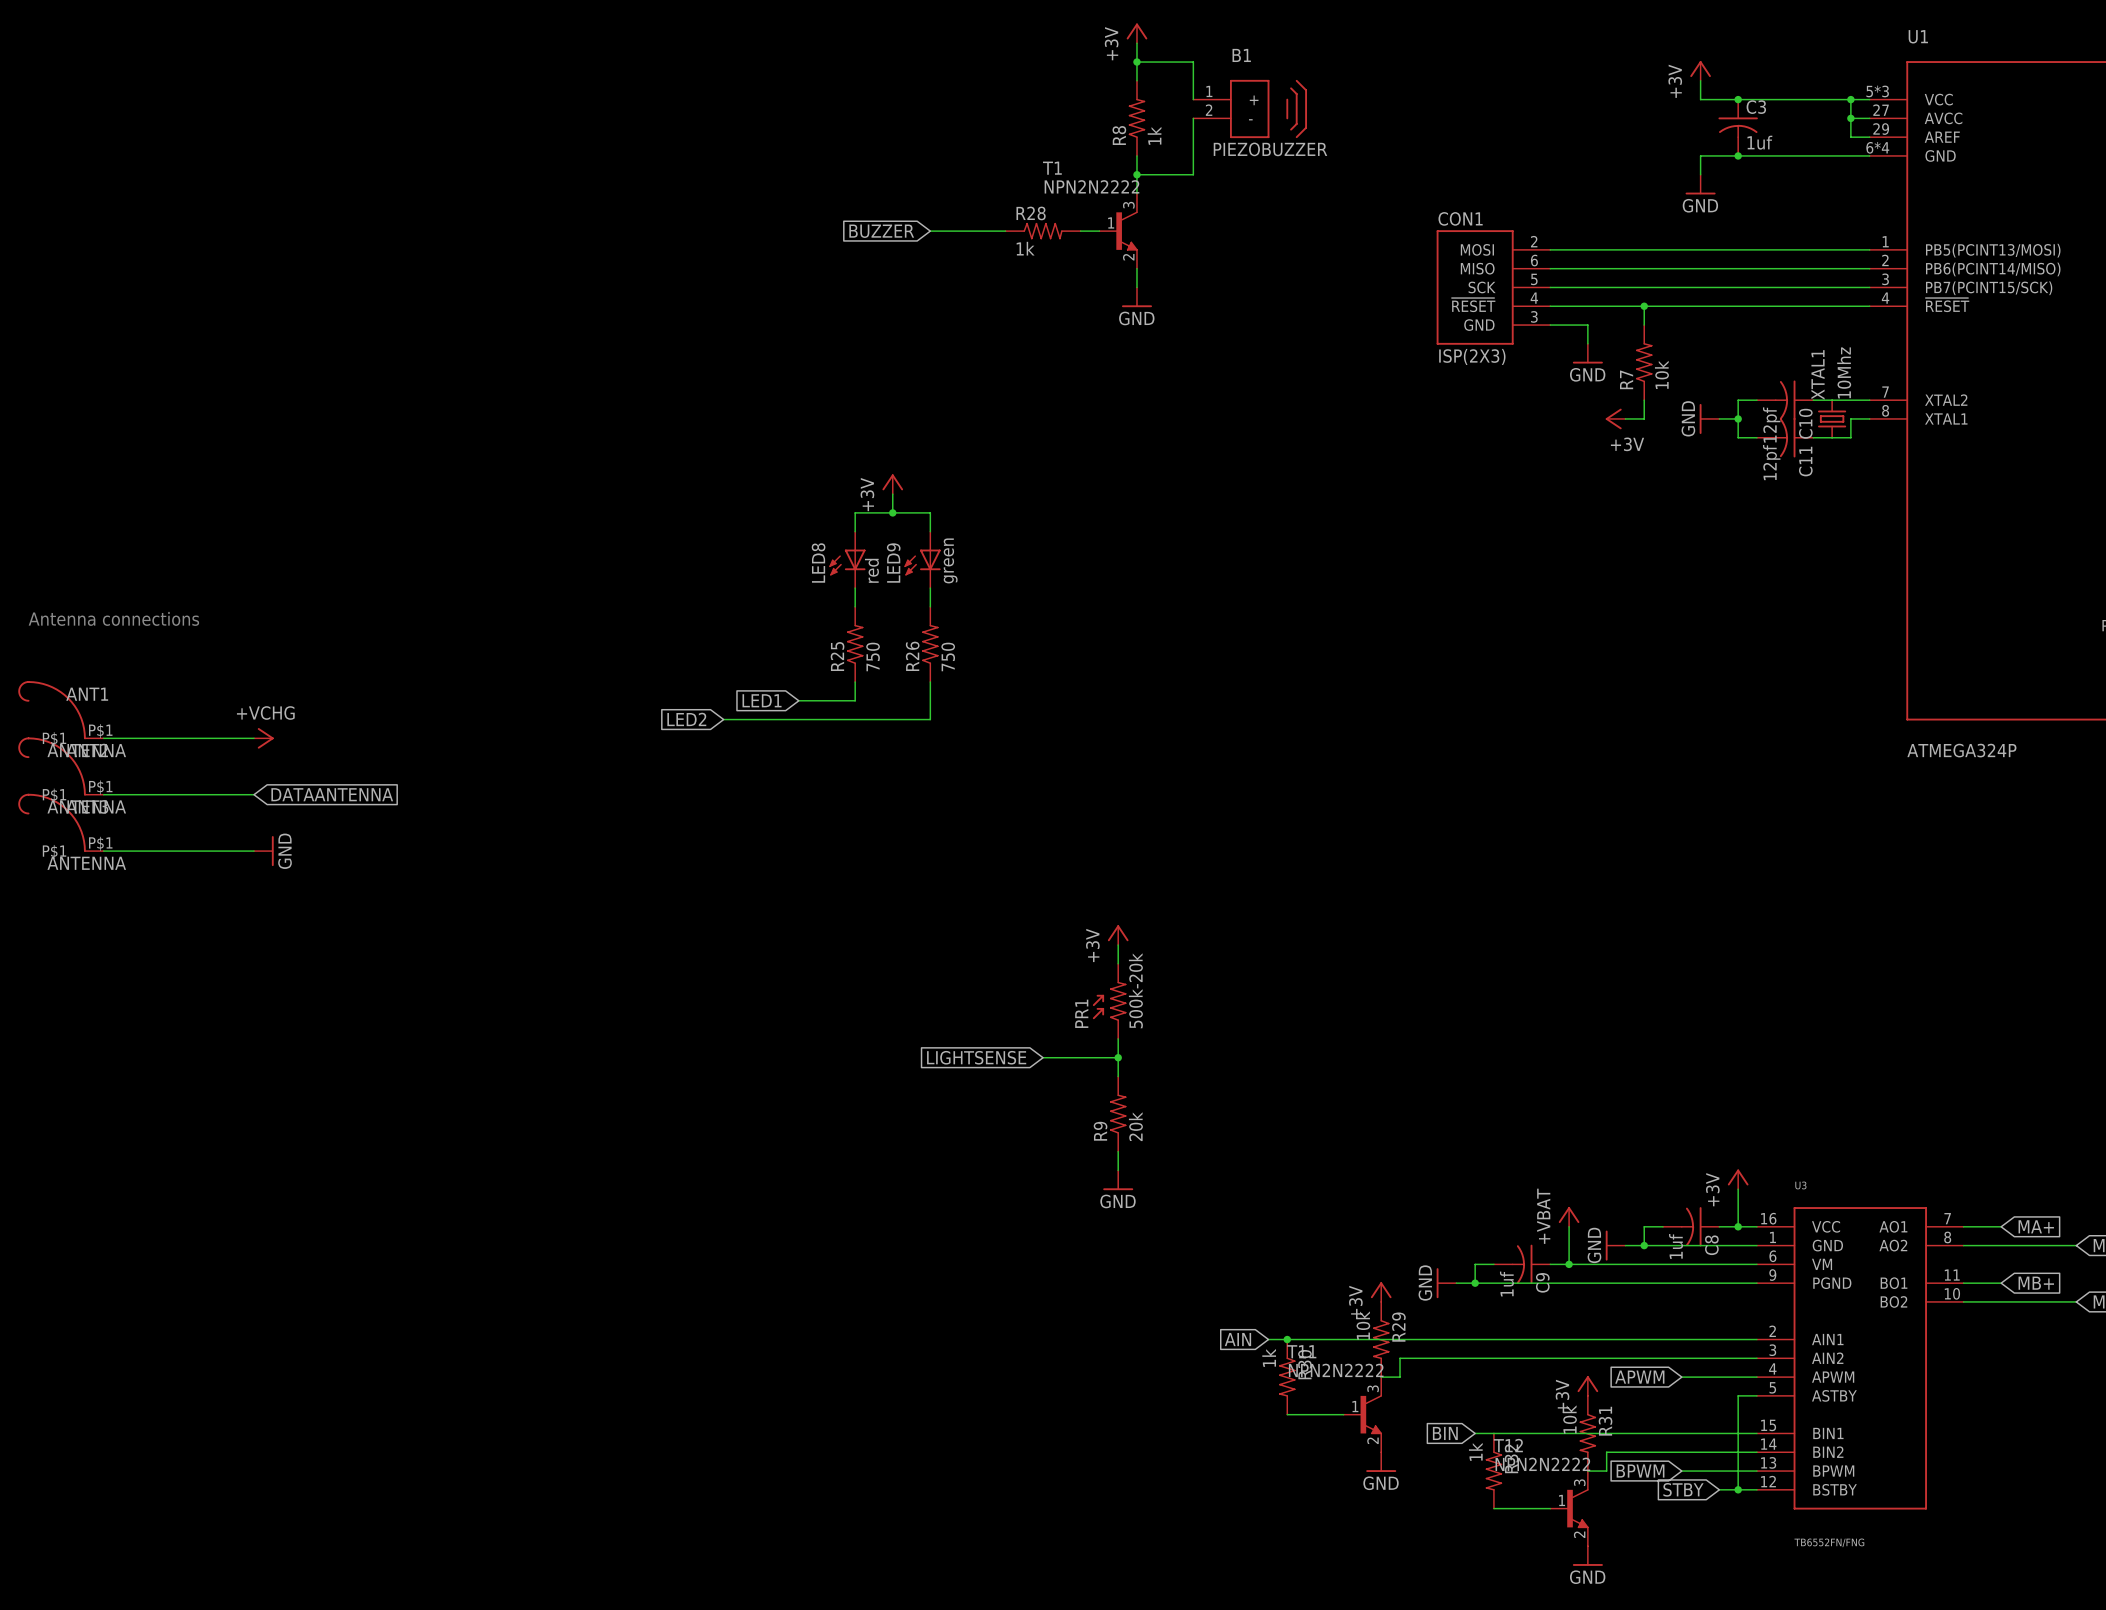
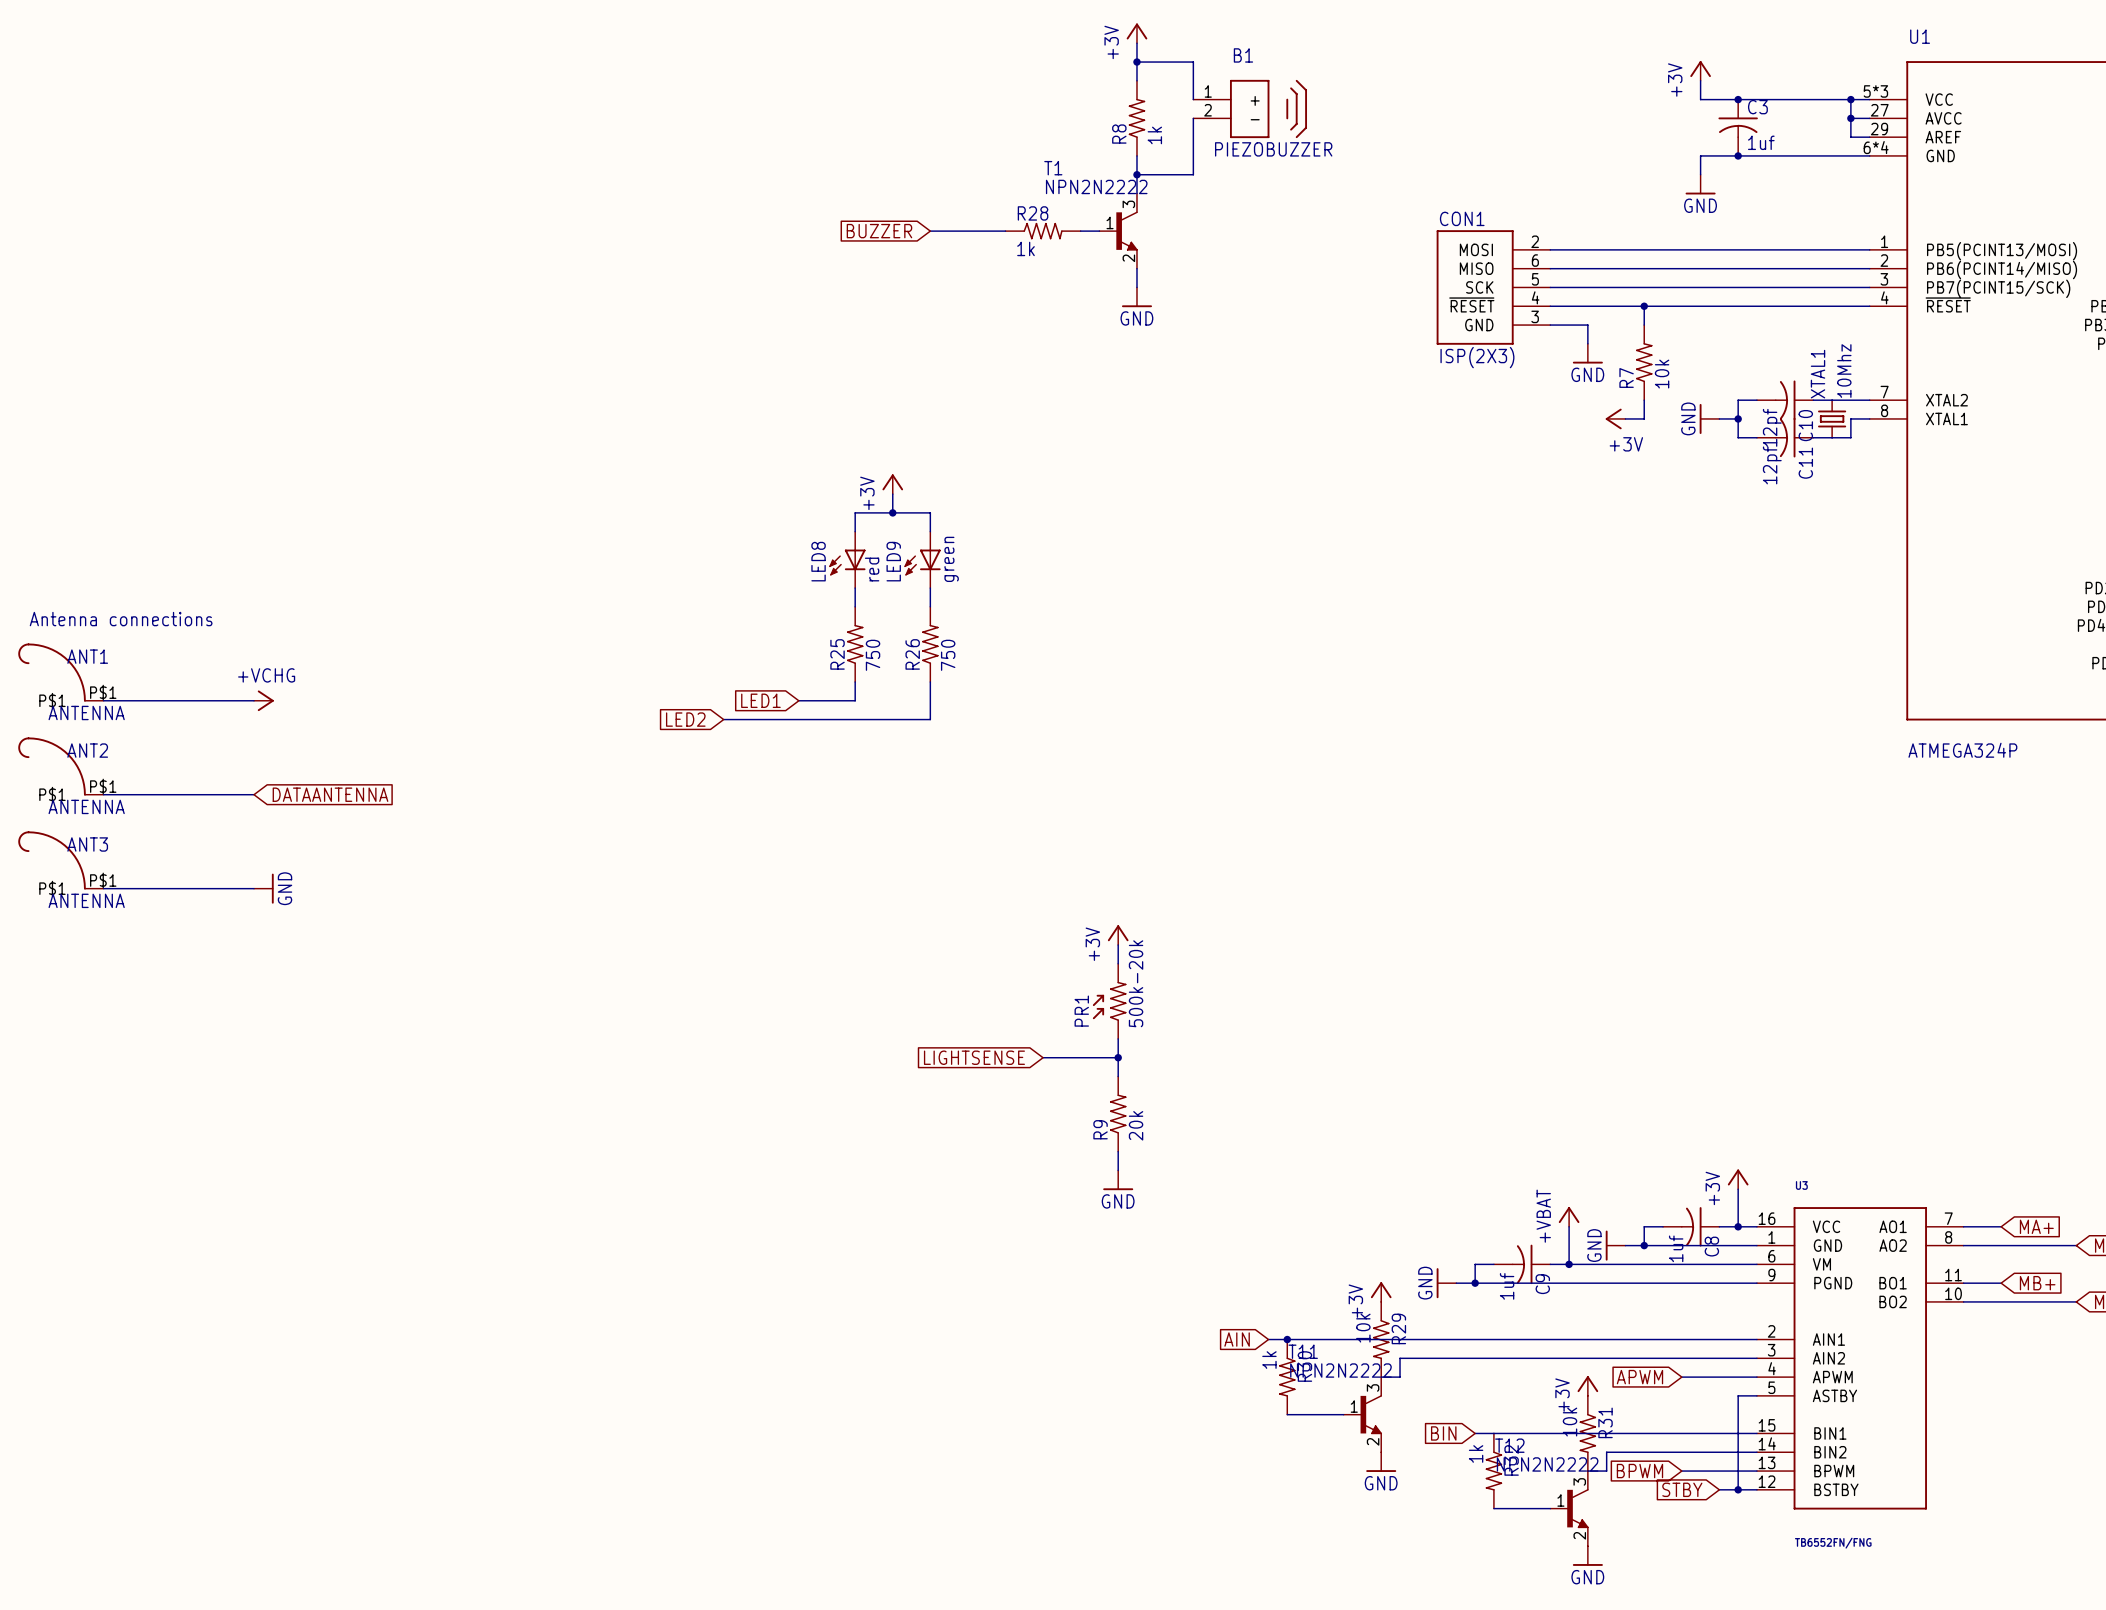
ANT1 position: (60, 710) -> (60, 672)
wire: (103, 738) (254, 738) -> (103, 700) (254, 700)
power symbol position: +VCHG (263, 738) -> +VCHG (263, 700)
ANT3 position: (60, 822) -> (60, 860)
wire: (103, 851) (254, 851) -> (103, 888) (254, 888)
power symbol position: GND (263, 851) -> GND (263, 888)

